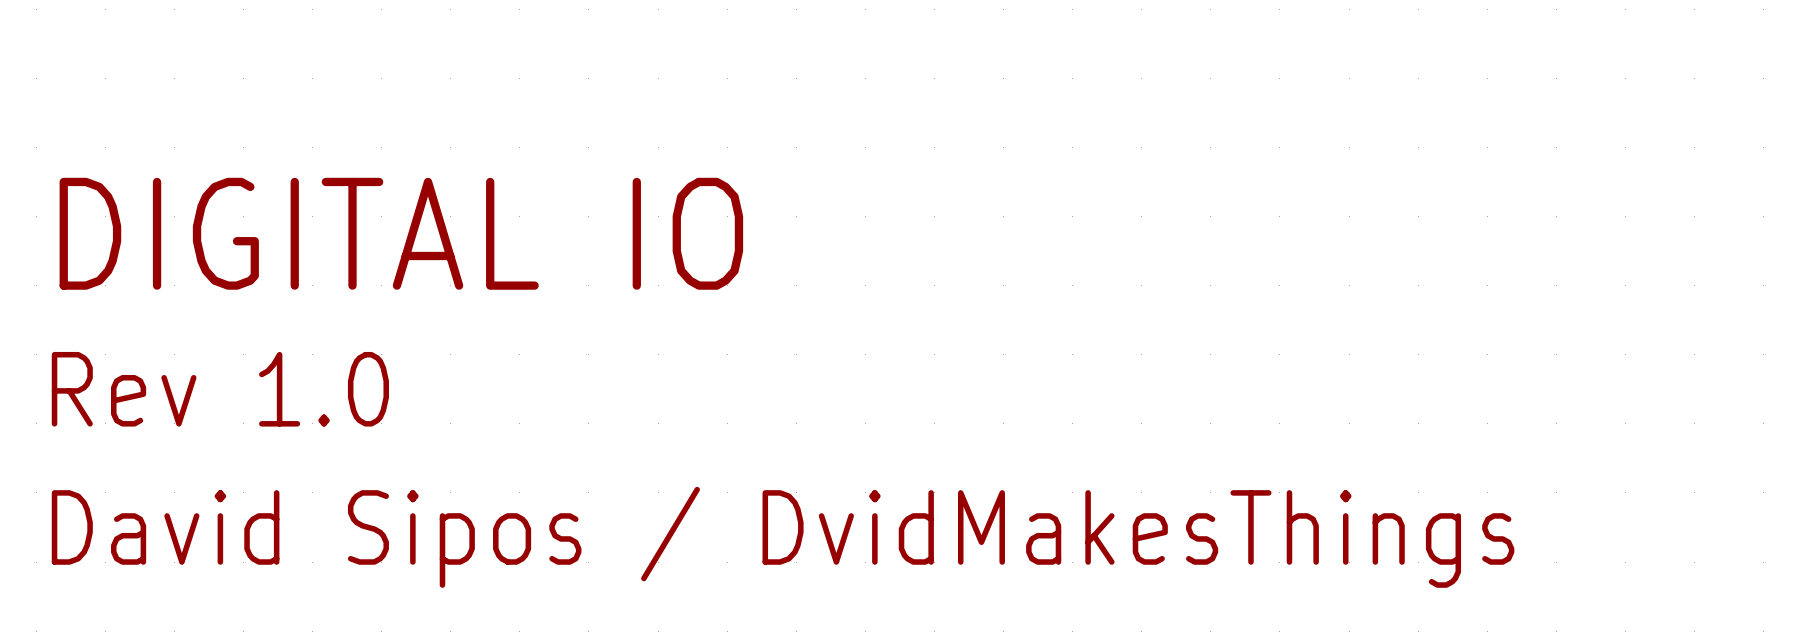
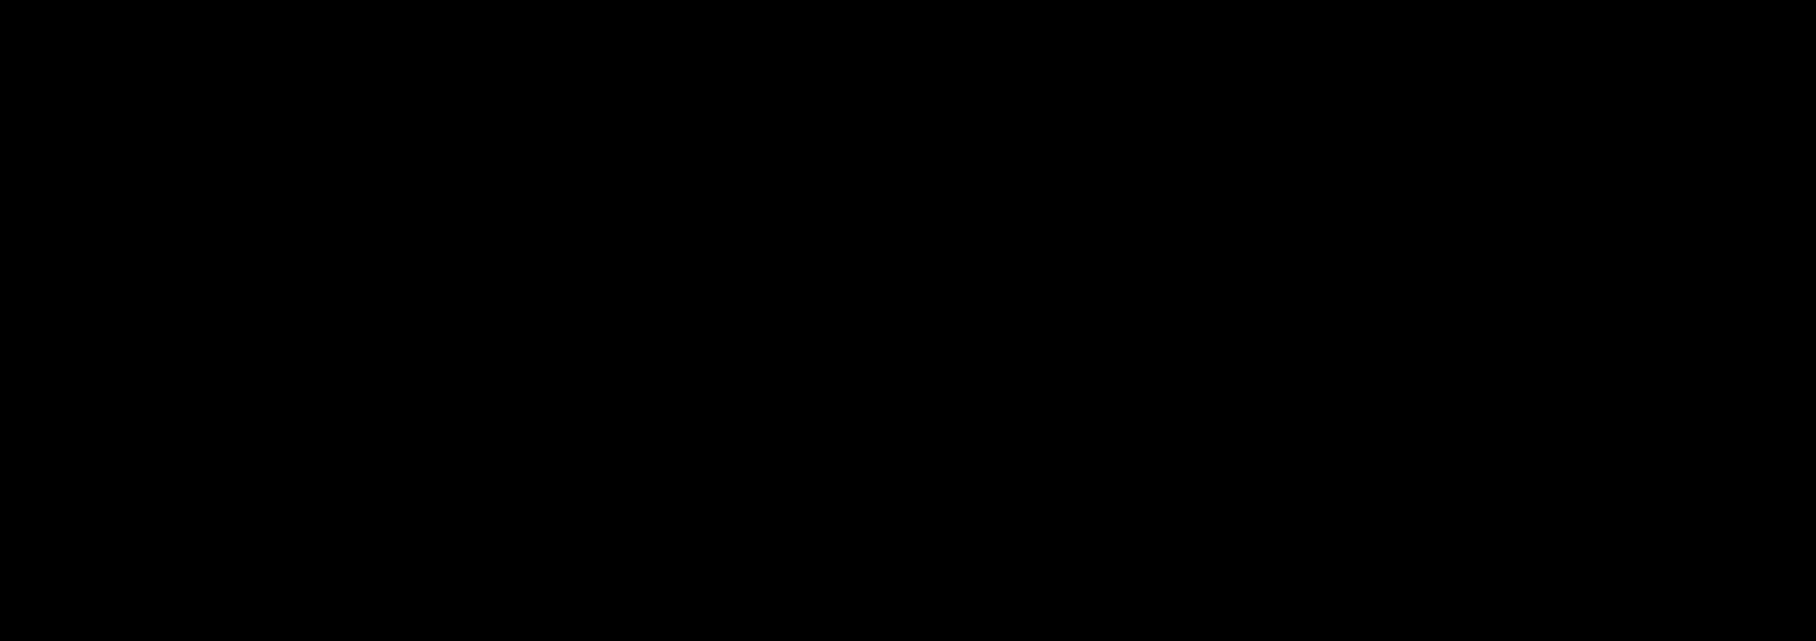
text: DIGITAL IO (401, 233) -> none
text: Rev 1.0 (220, 389) -> none
text: David Sipos / DvidMakesThings (783, 537) -> none

